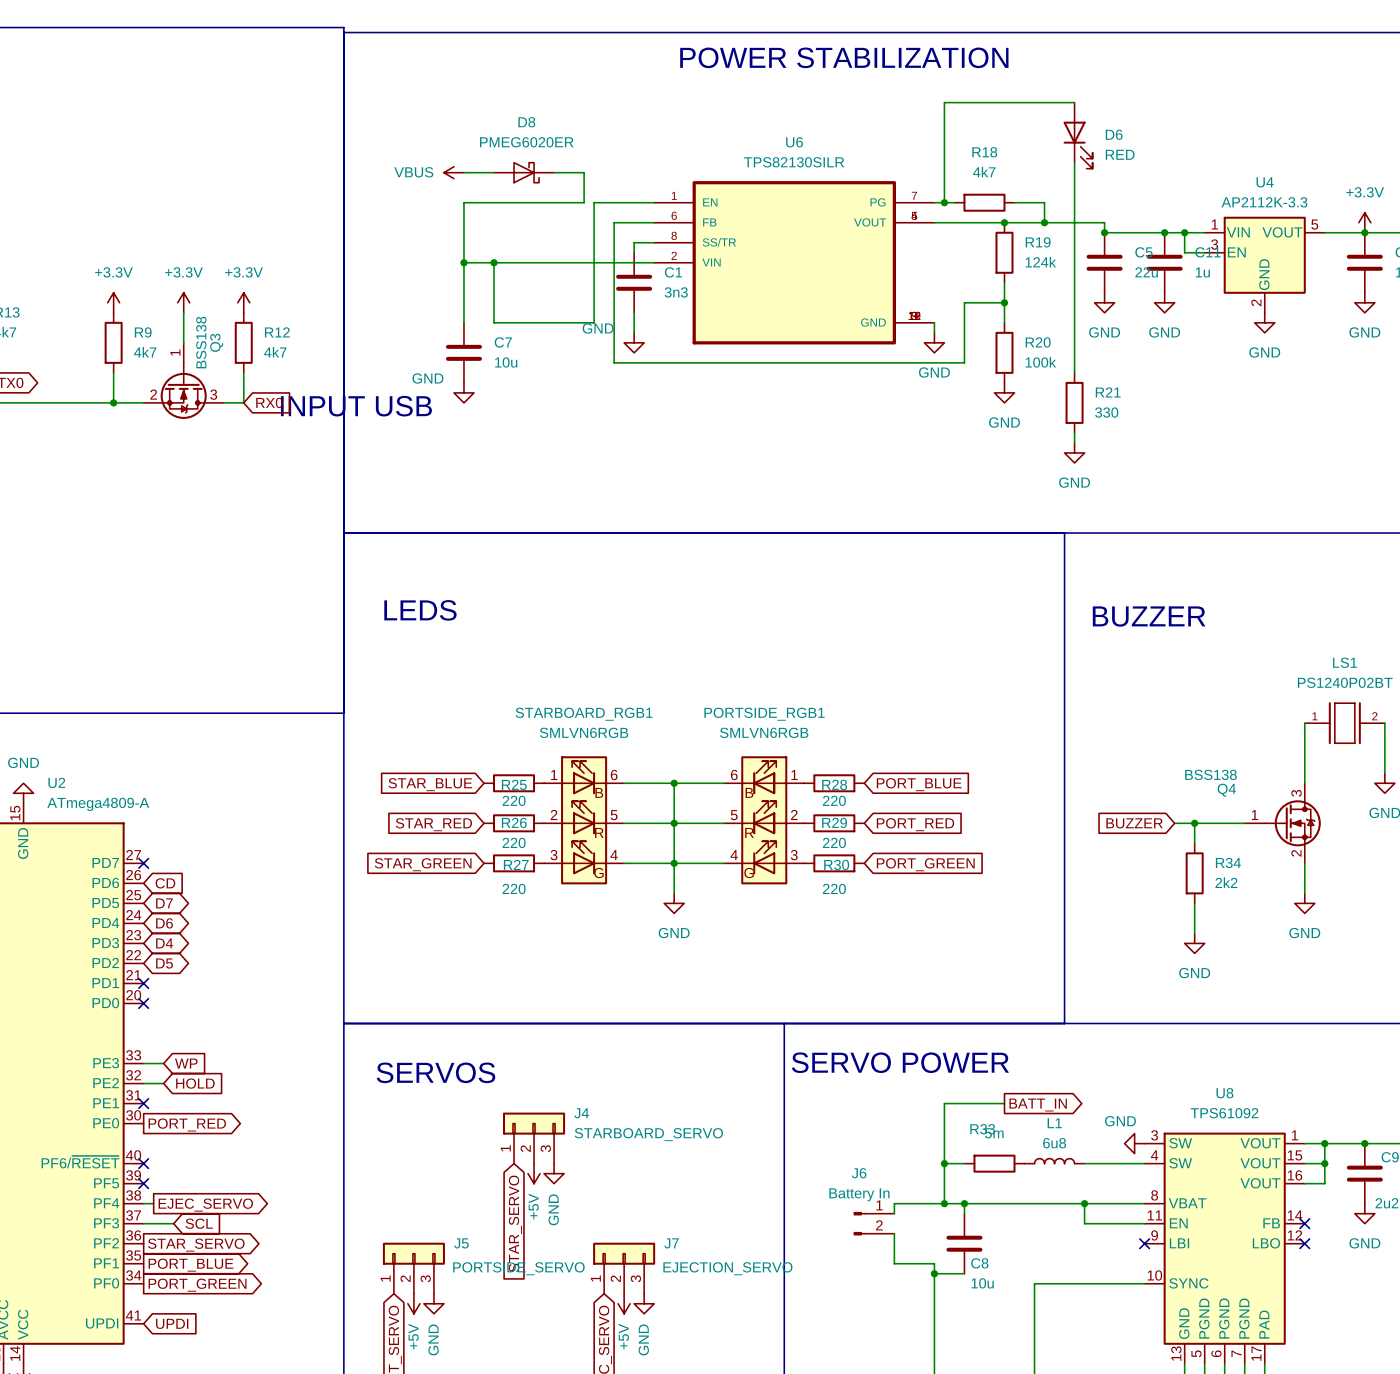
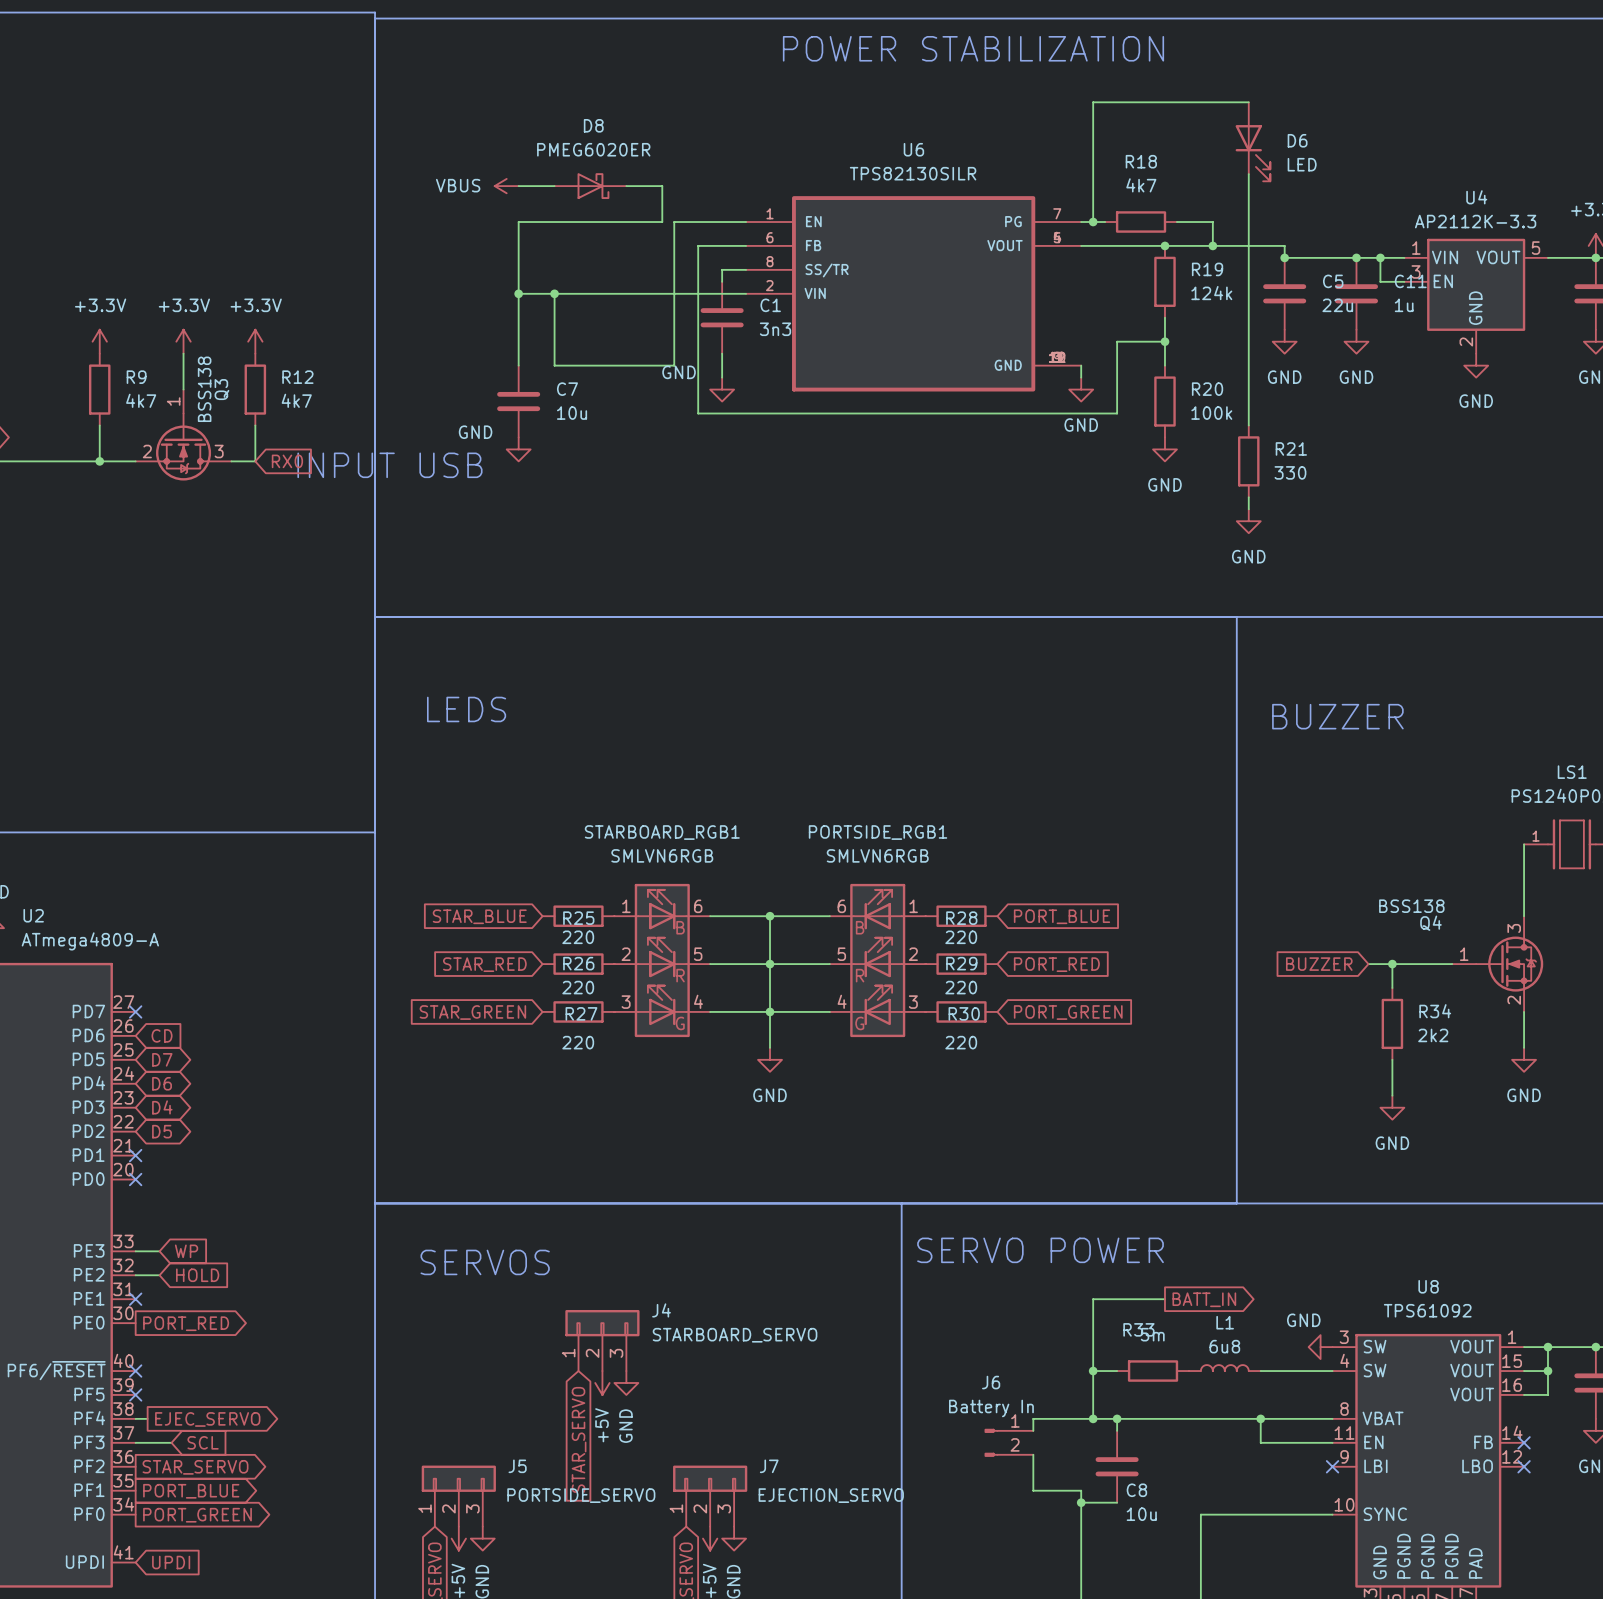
D6 value: RED (1120, 154) -> LED (1302, 164)

